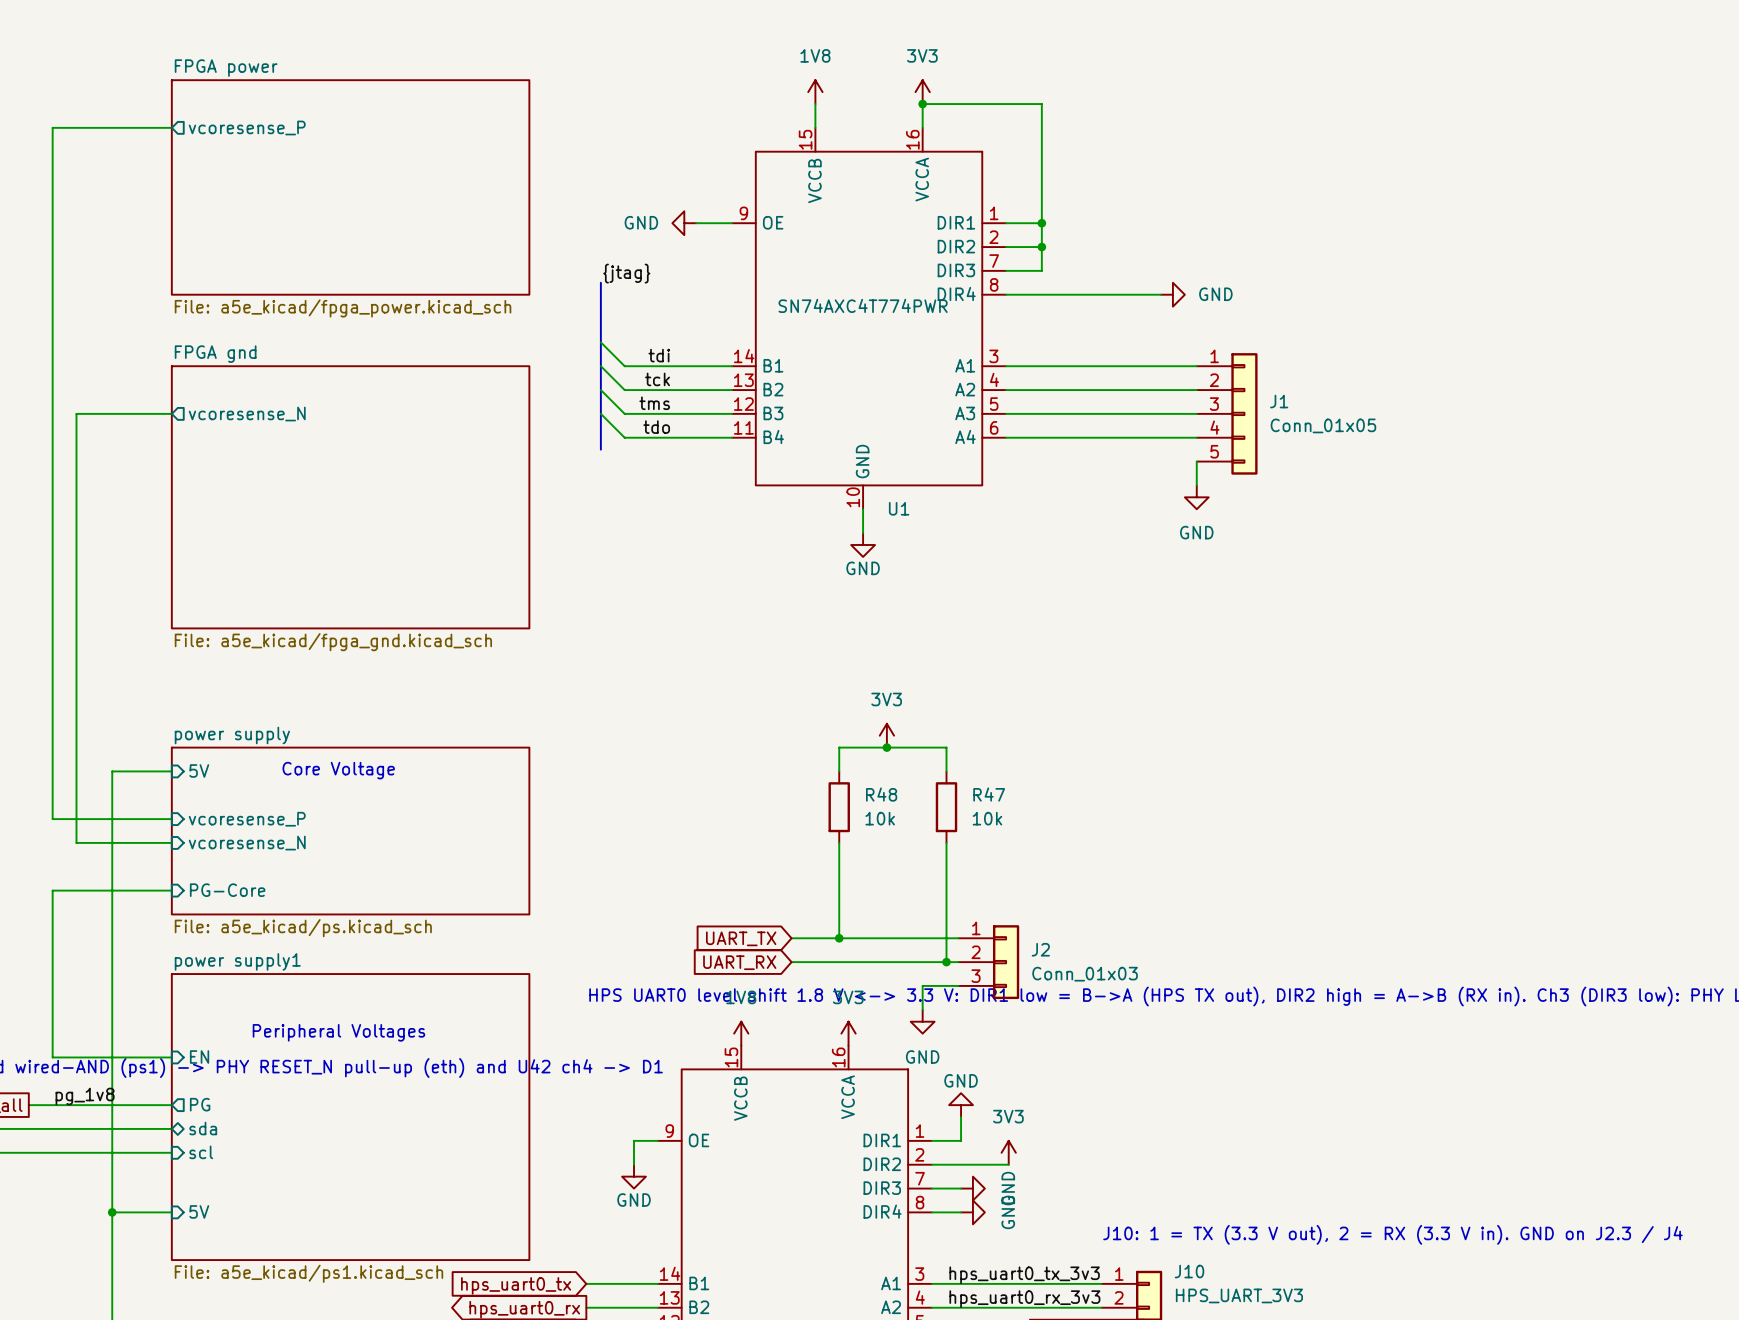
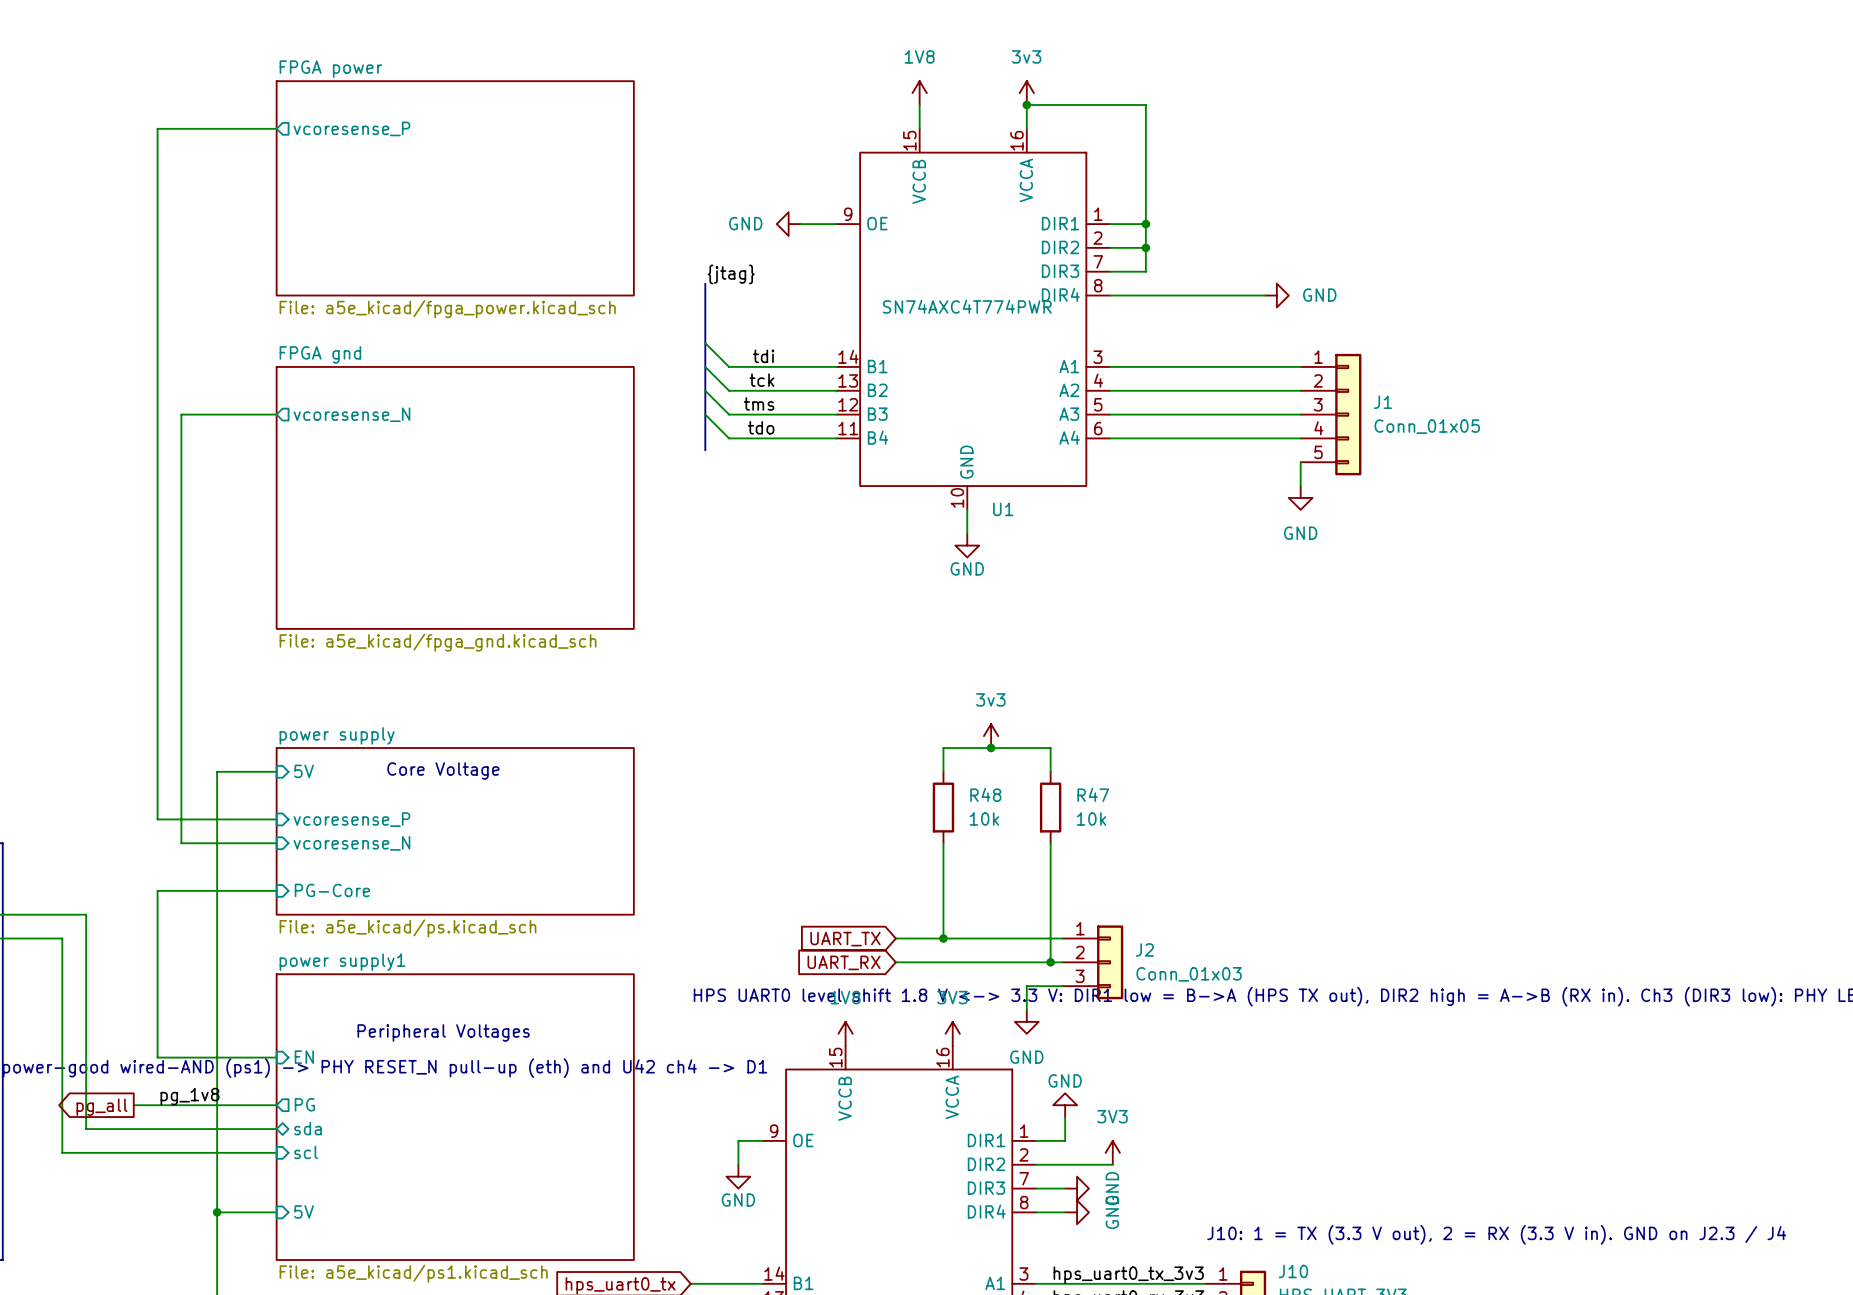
power symbol: 3V3 (922, 92) -> 3v3 (1026, 93)
power symbol: 3V3 (886, 735) -> 3v3 (991, 736)

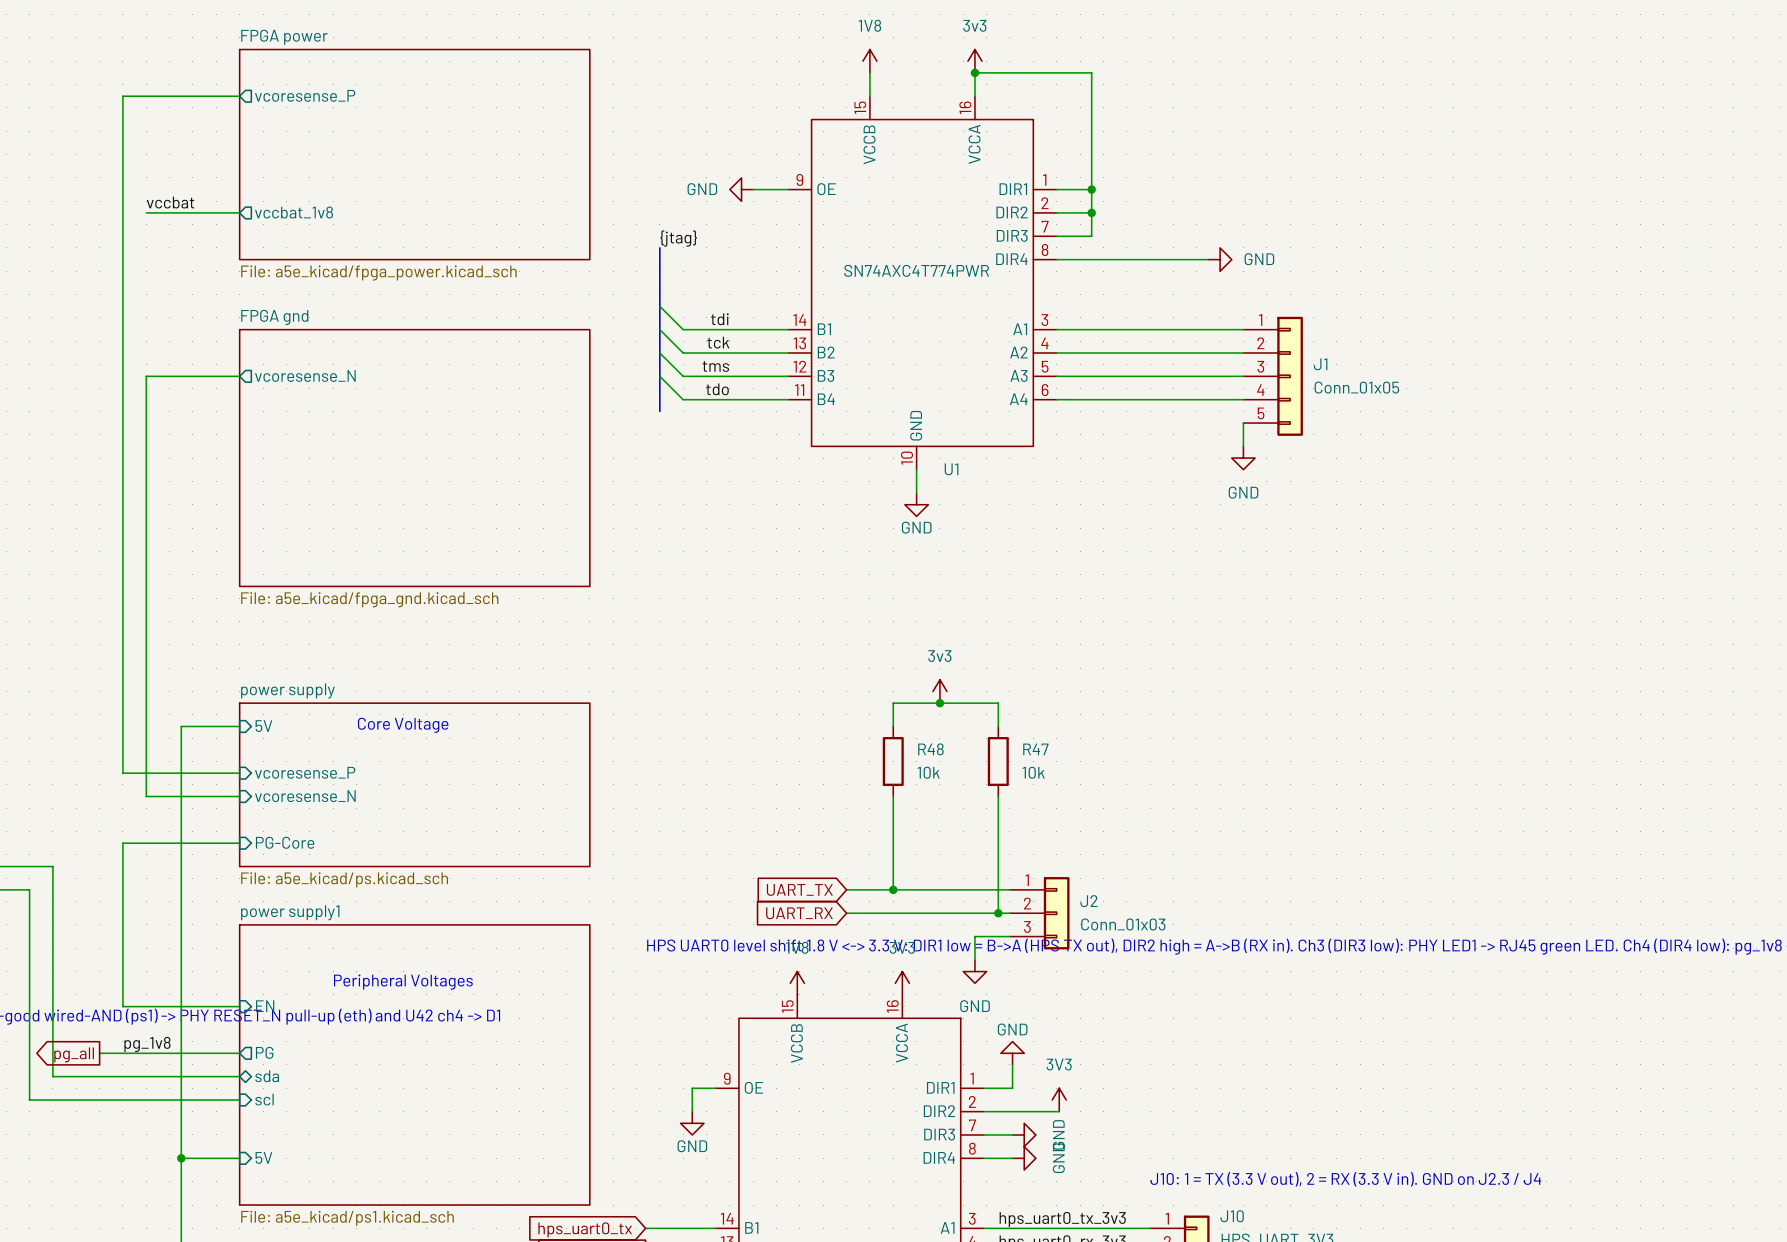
label: none -> vccbat (170, 202)
wire: none -> (146, 212) (239, 212)
sheet pin: none -> vccbat_1v8 (293, 212)

